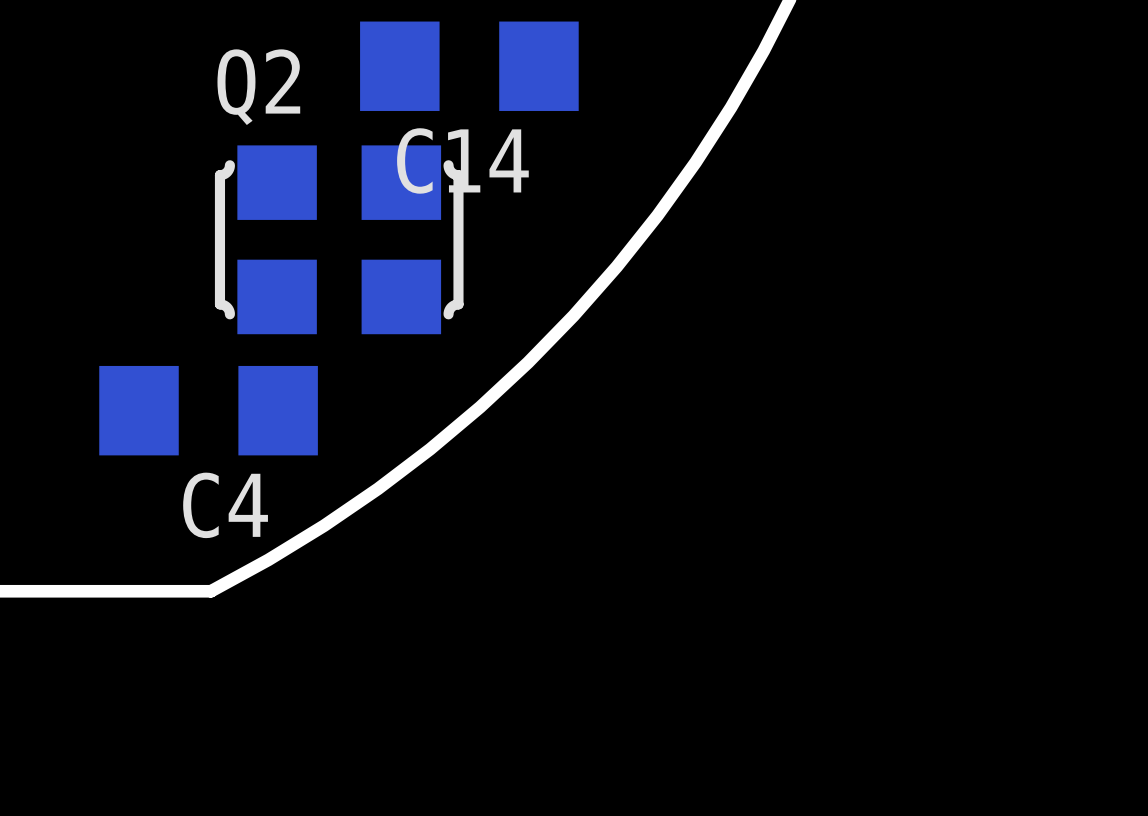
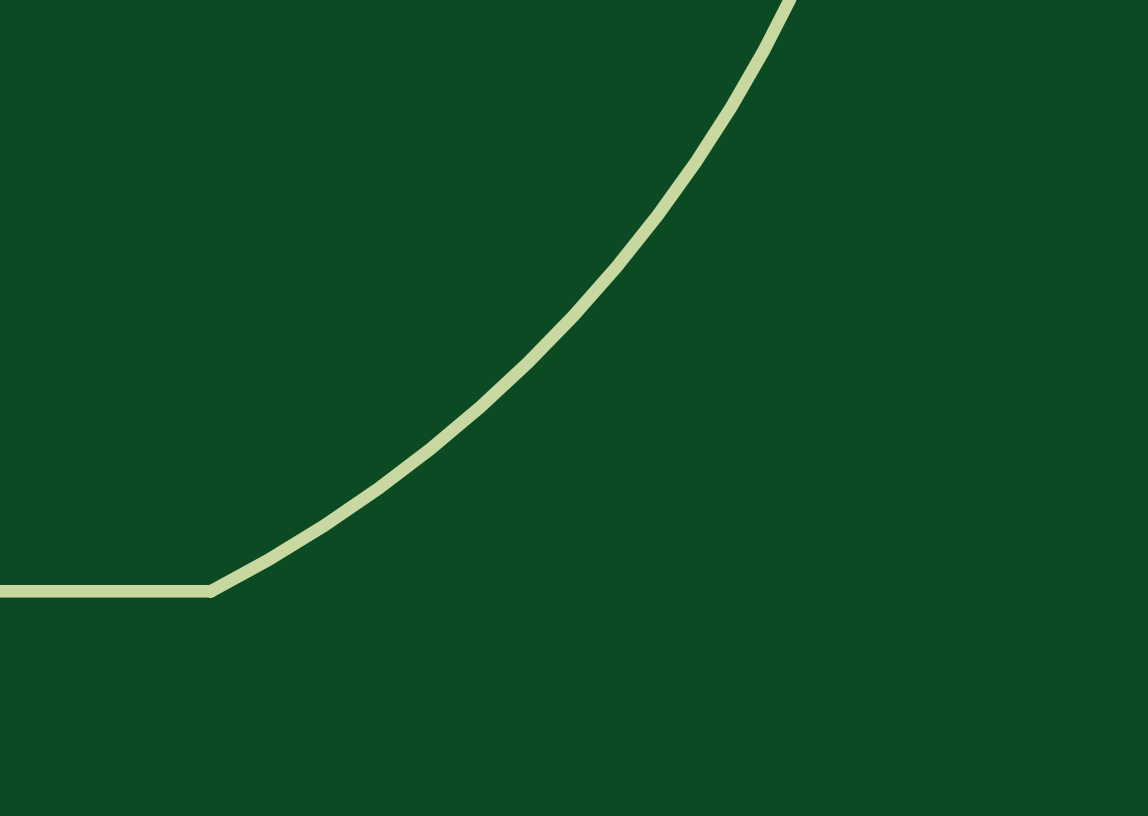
C14: (469, 66) -> none
Q2: (339, 239) -> none
C4: (208, 410) -> none

